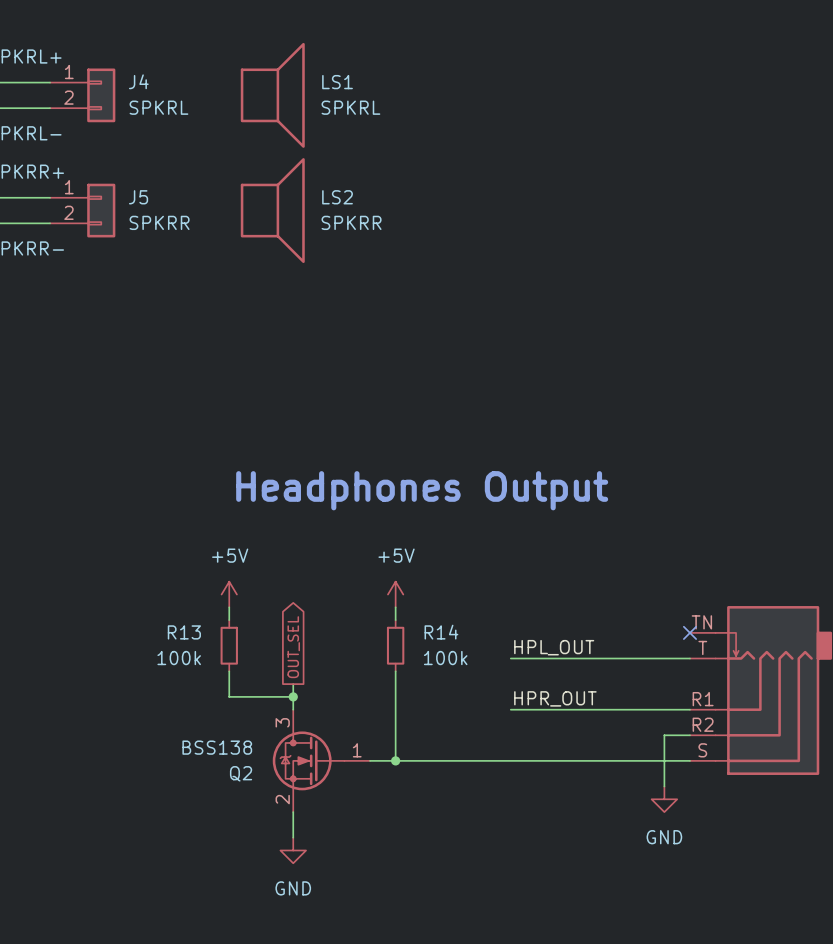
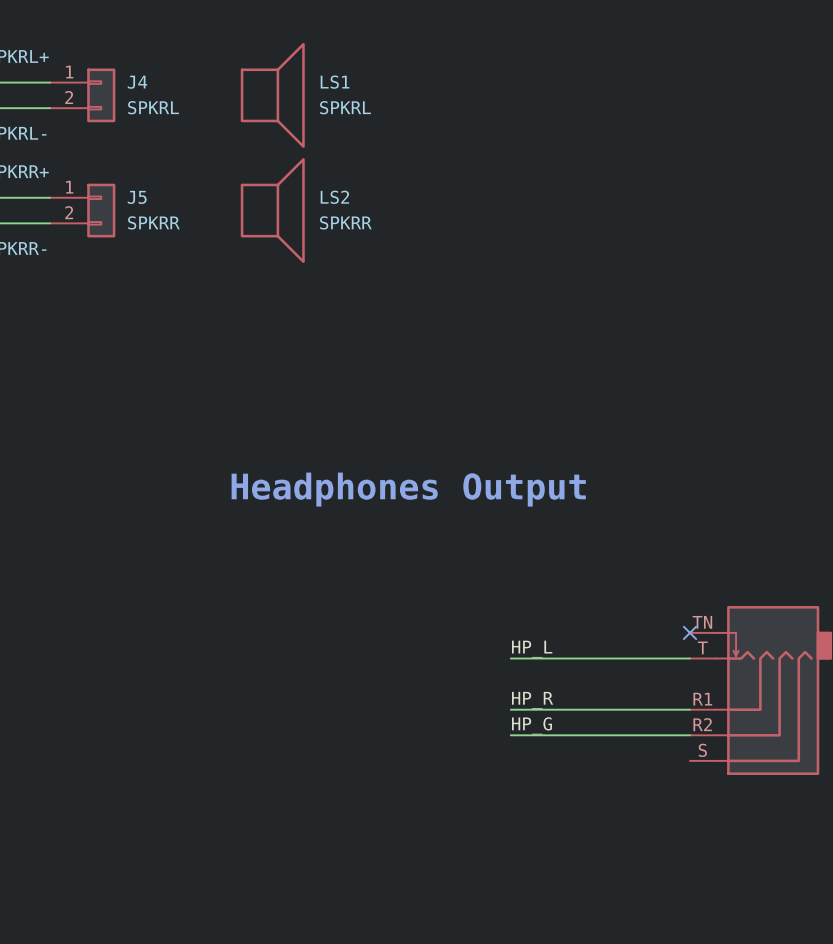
power symbol: +5V (229, 594) -> none
power symbol: +5V (395, 594) -> none
wire: (229, 607) (229, 620) -> none
wire: (395, 607) (395, 620) -> none
R13: 100k (229, 645) -> none
R14: 100k (395, 645) -> none
global label: OUT_SEL (293, 647) -> none
label: HPL_OUT (554, 647) -> HP_L (532, 649)
wire: (229, 671) (229, 696) (293, 696) -> none
wire: (395, 671) (395, 760) -> none
wire: (293, 684) (293, 709) -> none
junction: (293, 696) -> none
label: HPR_OUT (555, 698) -> HP_R (532, 700)
label: none -> HP_G (531, 725)
wire: (664, 735) (664, 786) -> (664, 735) (510, 735)
Q2: BSS138 (321, 760) -> none
wire: (370, 760) (689, 760) -> none
junction: (395, 760) -> none
power symbol: GND (664, 799) -> none
wire: (293, 812) (293, 837) -> none
power symbol: GND (293, 850) -> none

